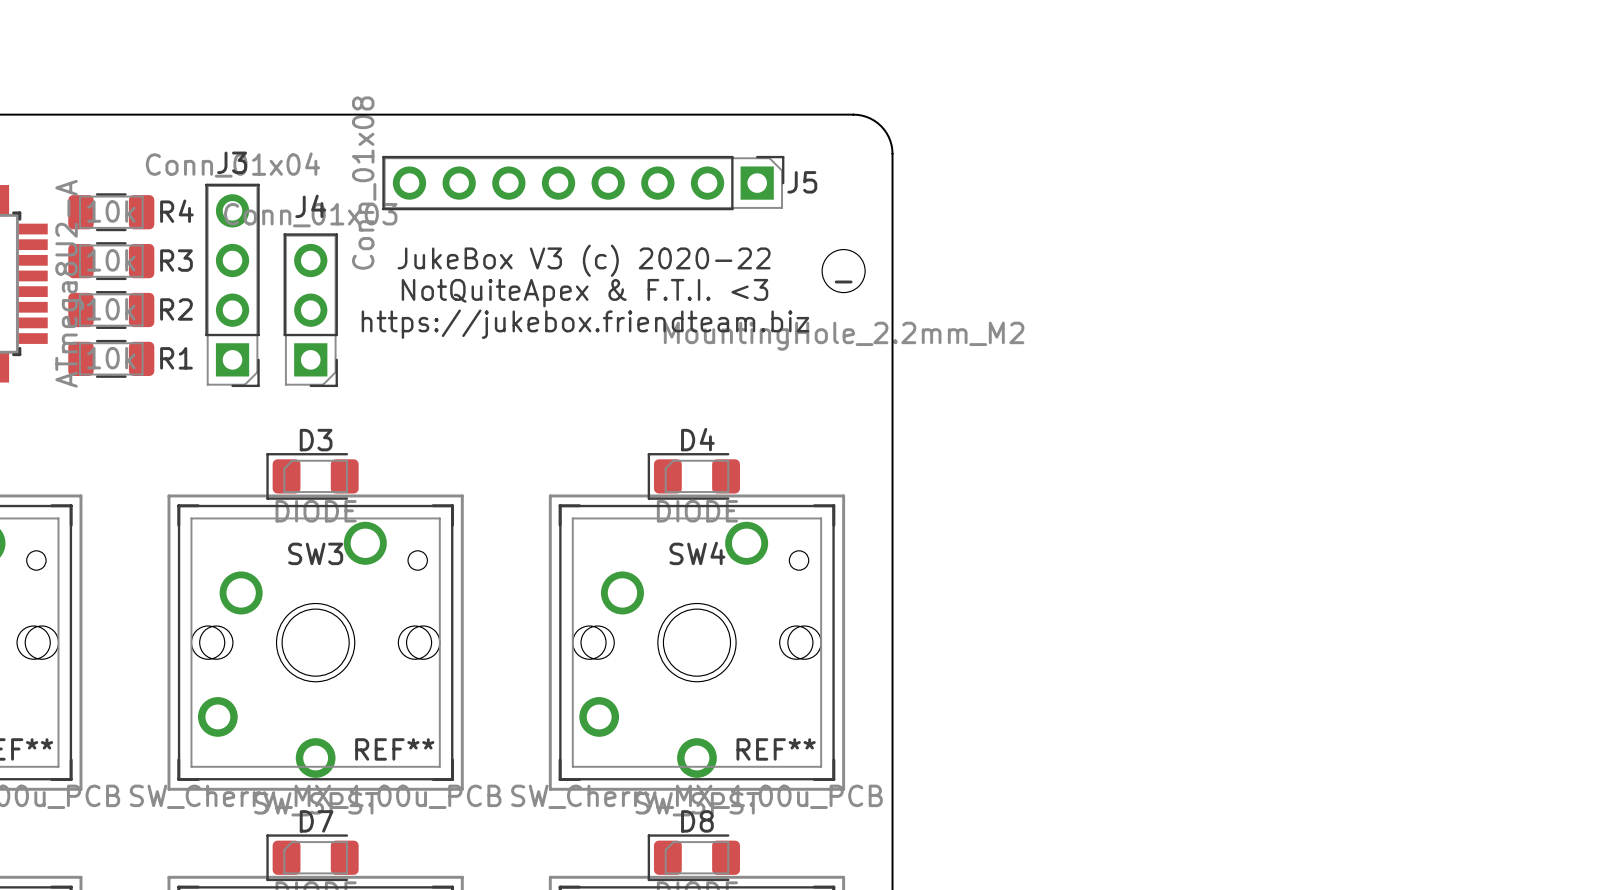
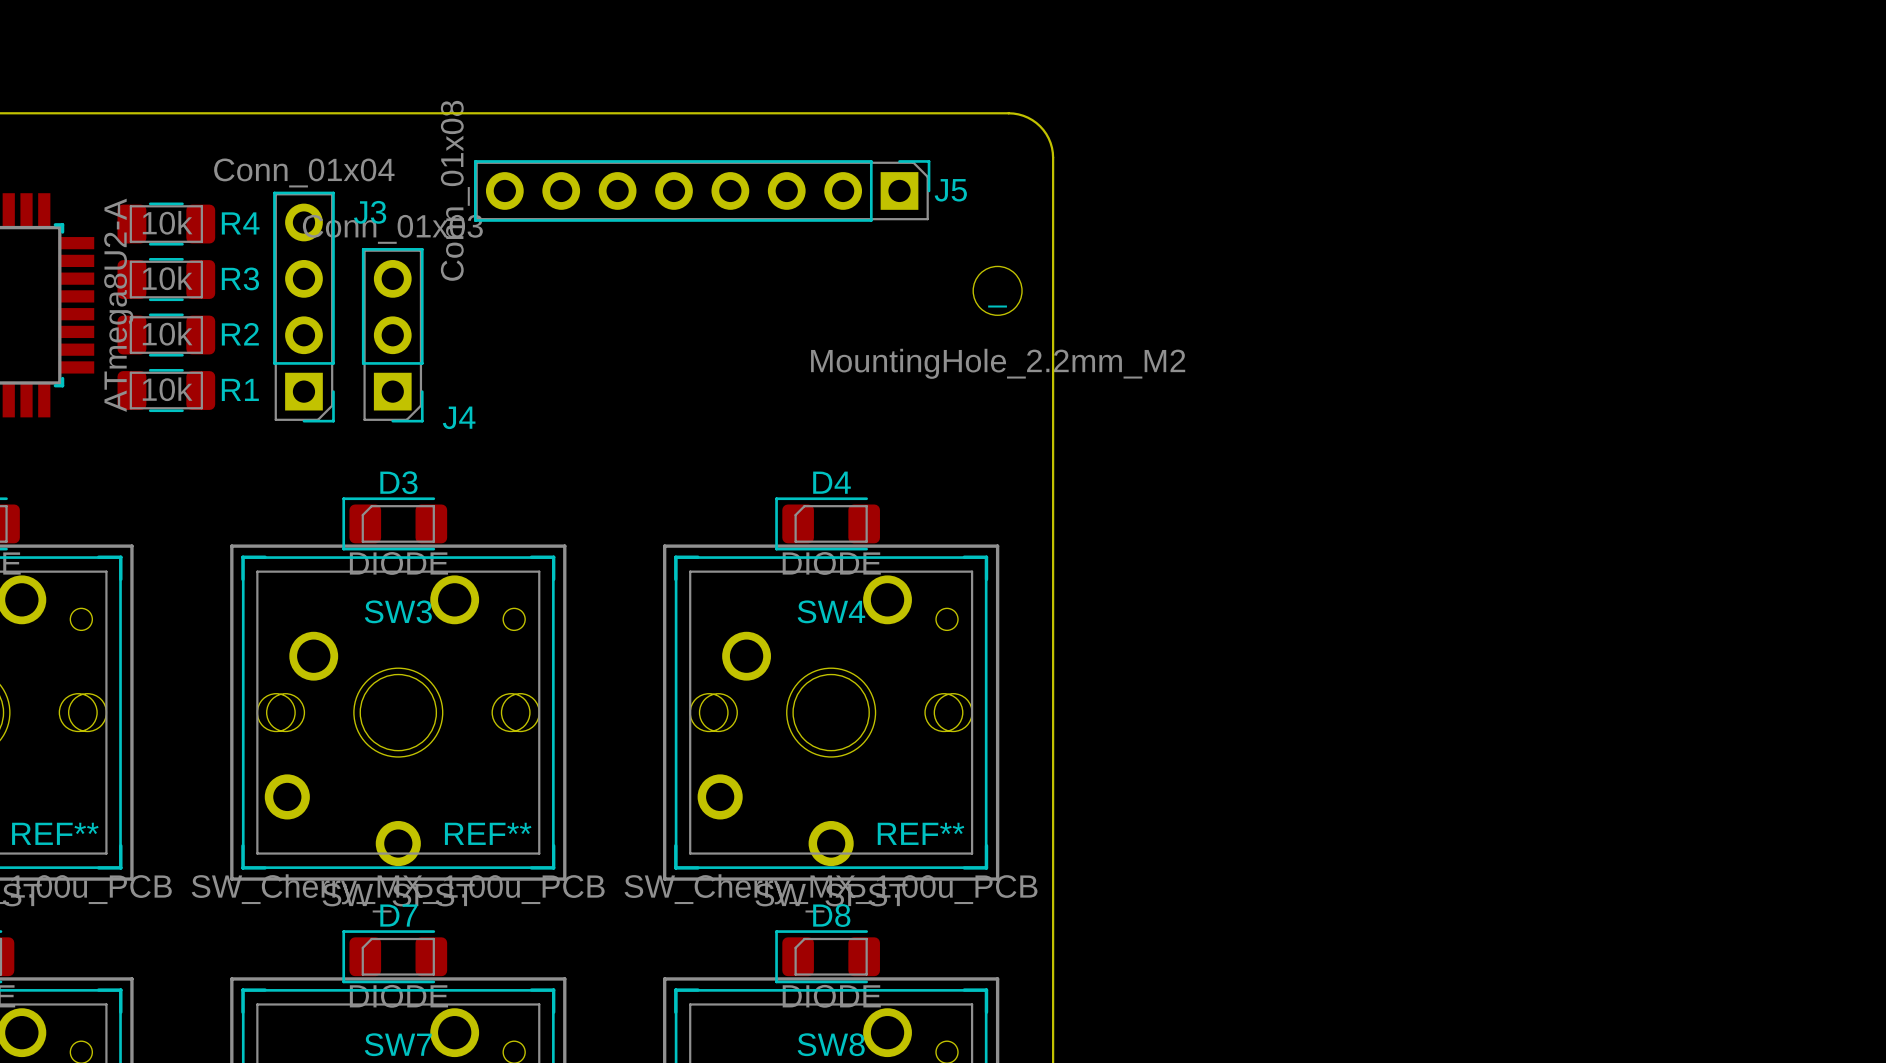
J3 name position: J3 (232, 162) -> J3 (370, 212)
J4 name position: J4 (310, 206) -> J4 (459, 417)
text: JukeBox V3 (c) 2020-22 (584, 260) -> none
text: NotQuiteApex & F.T.I. <3 (584, 293) -> none
text: https://jukebox.friendteam.biz (585, 324) -> none

